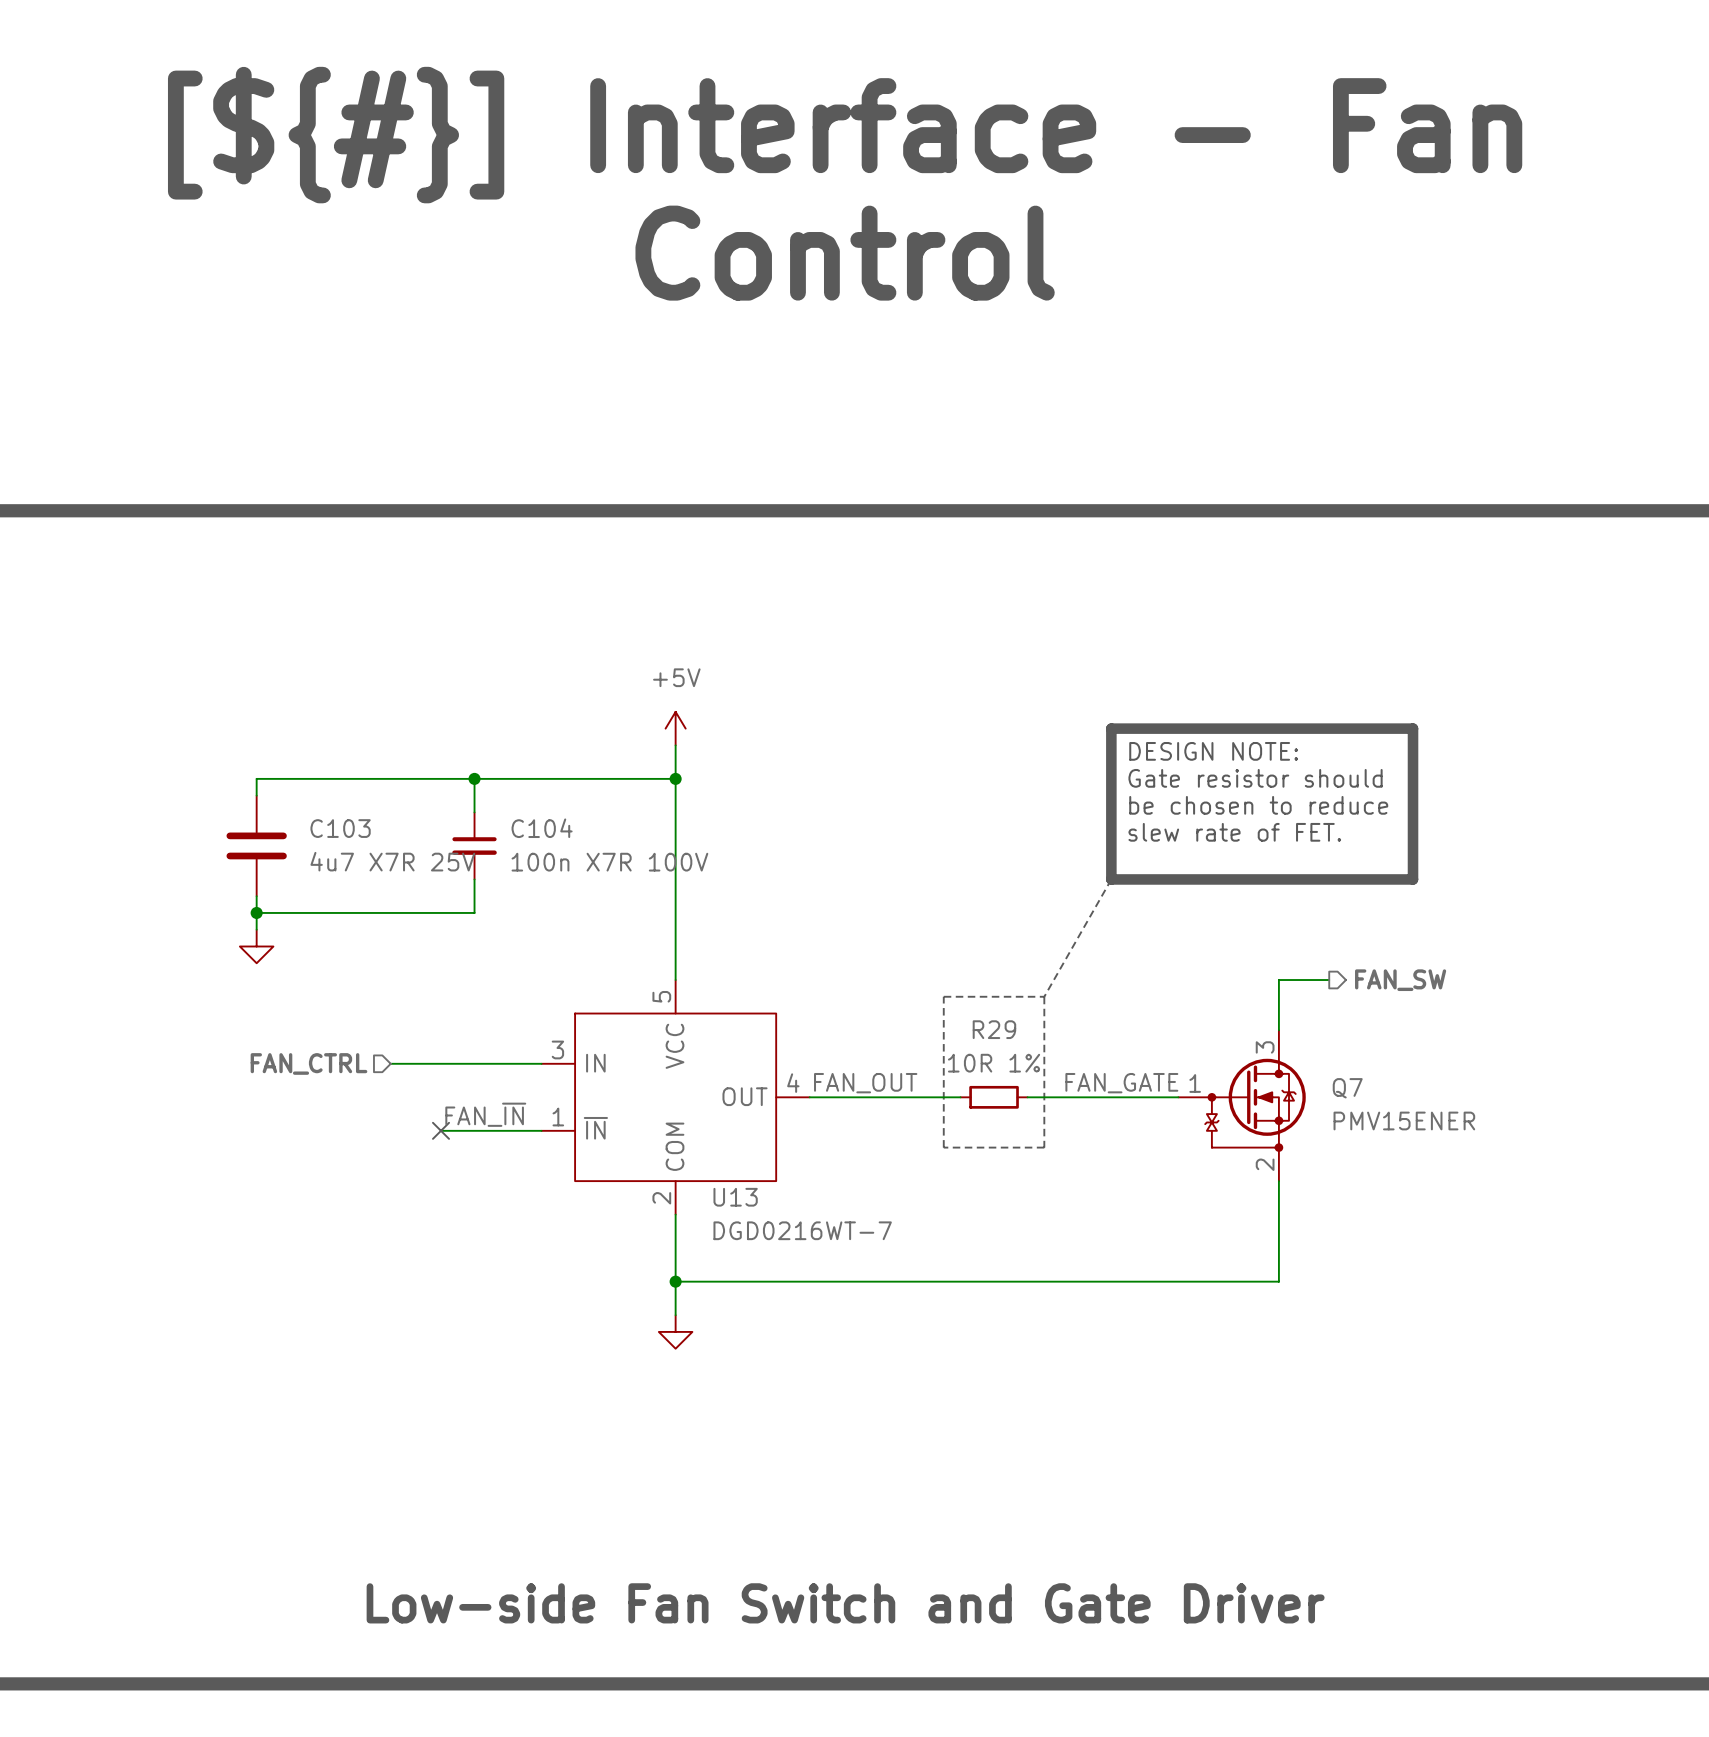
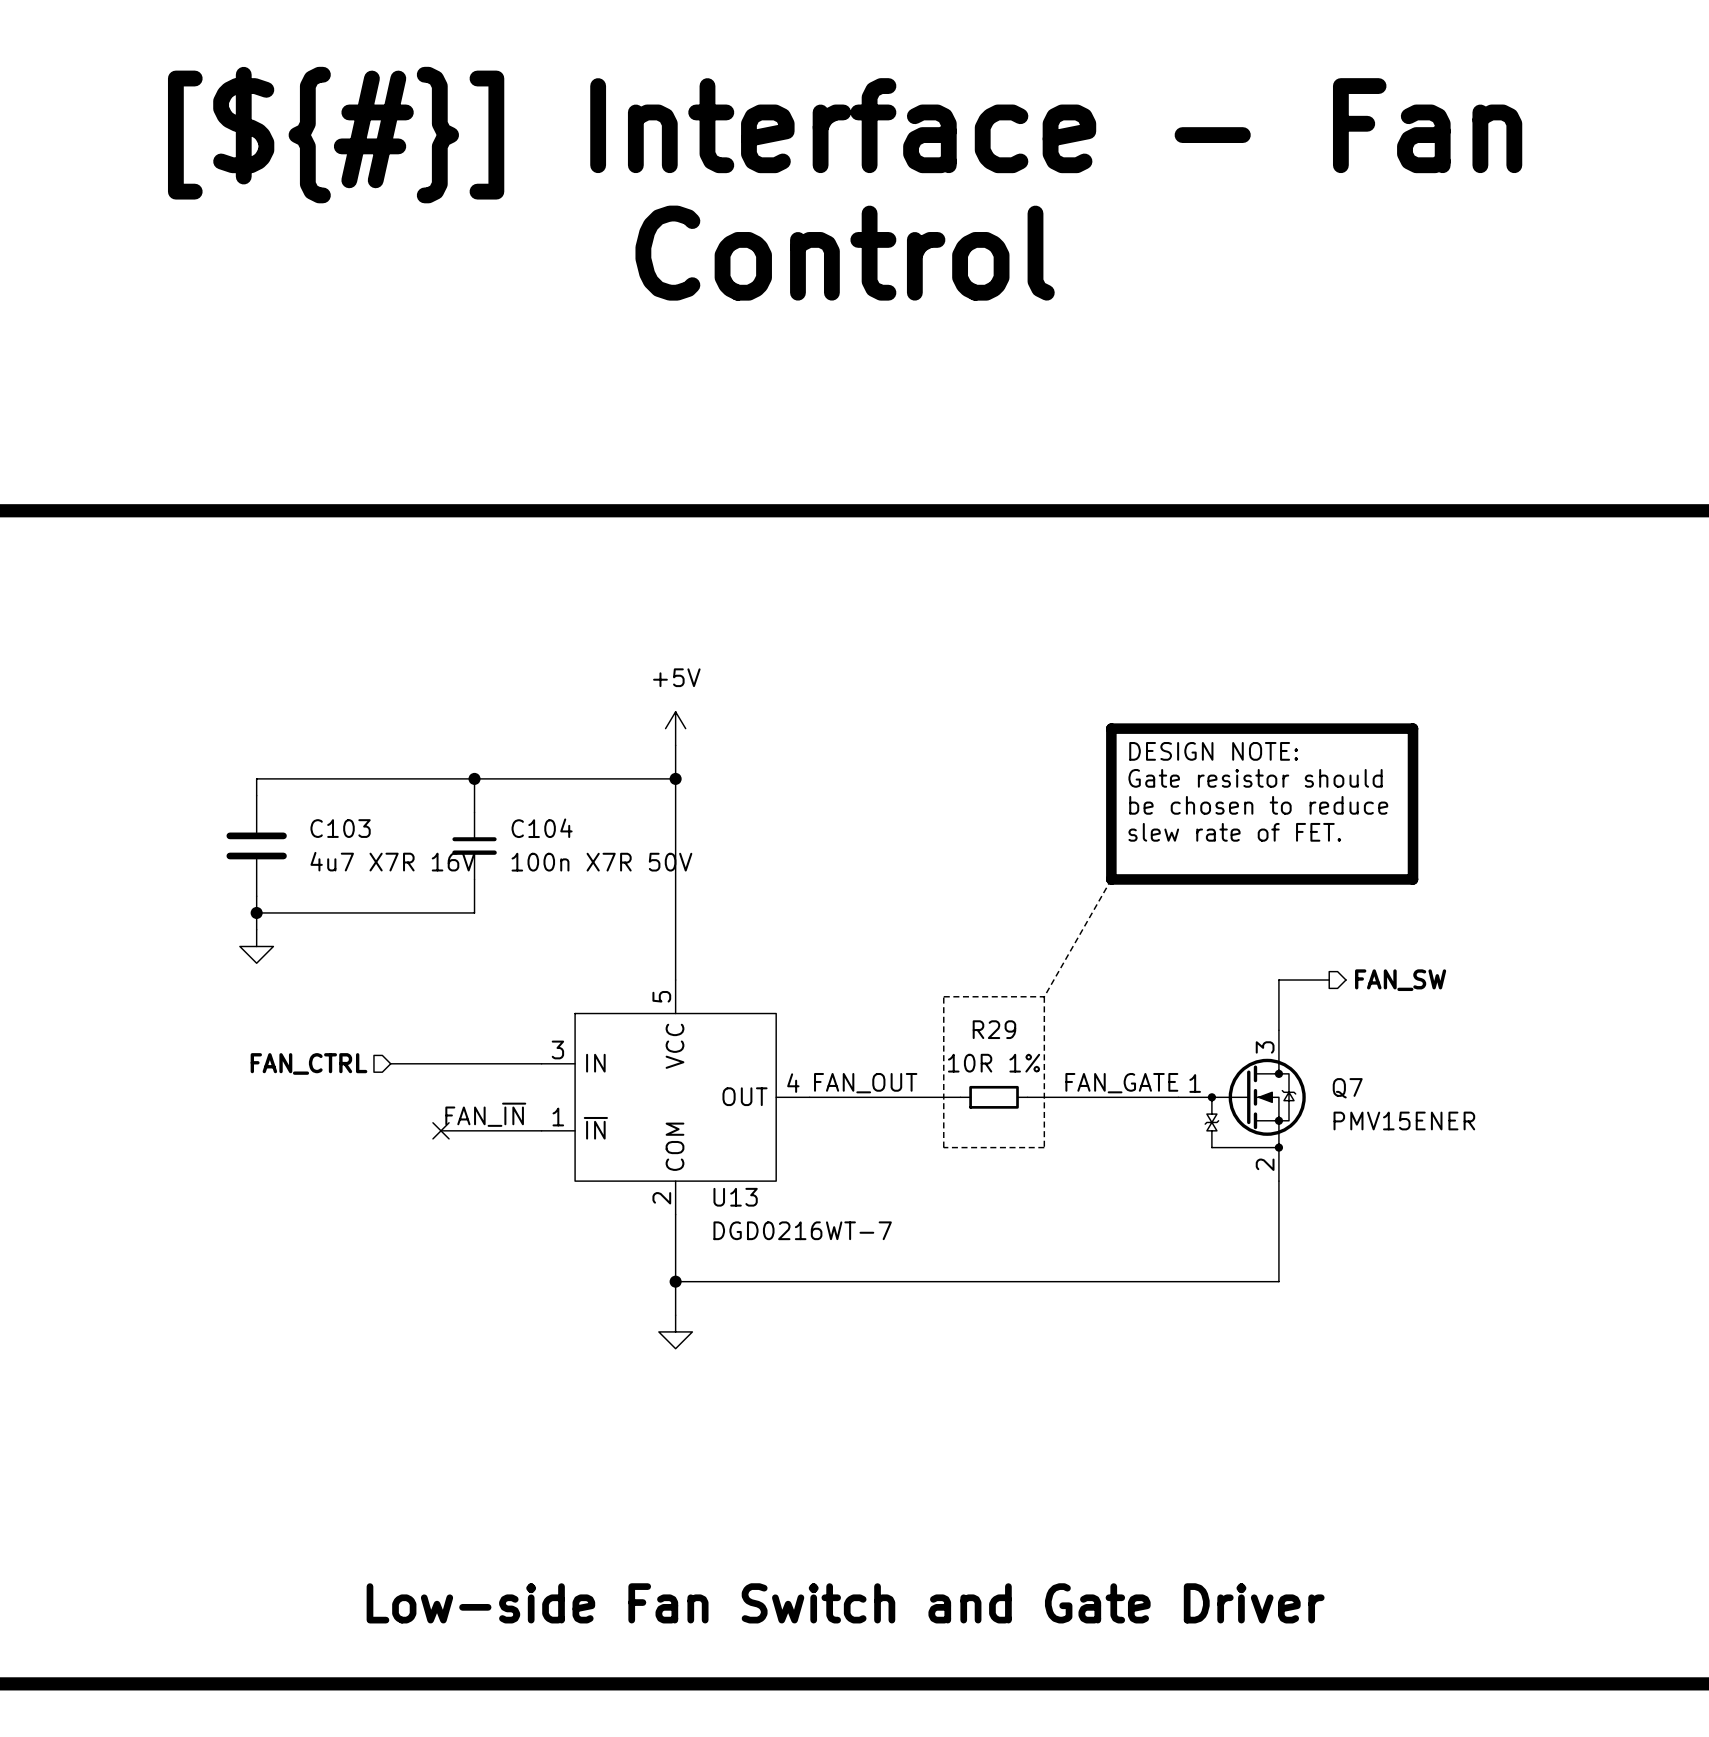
C103 value: 4u7 X7R 25V (392, 861) -> 4u7 X7R 16V (392, 861)
C104 value: 100n X7R 100V (609, 862) -> 100n X7R 50V (601, 862)

